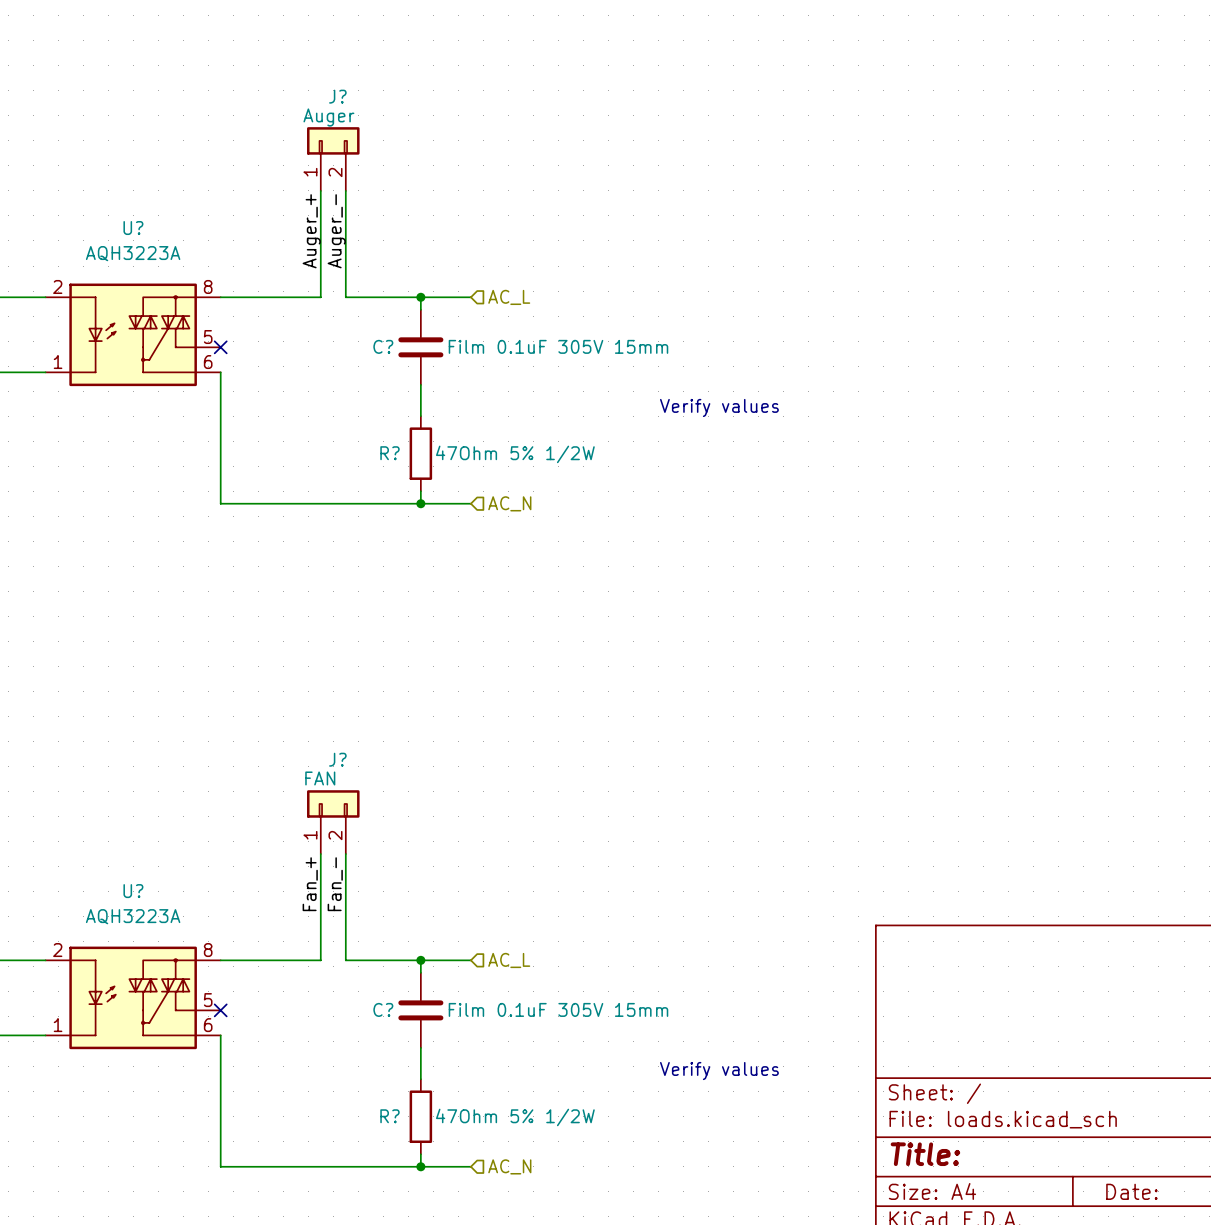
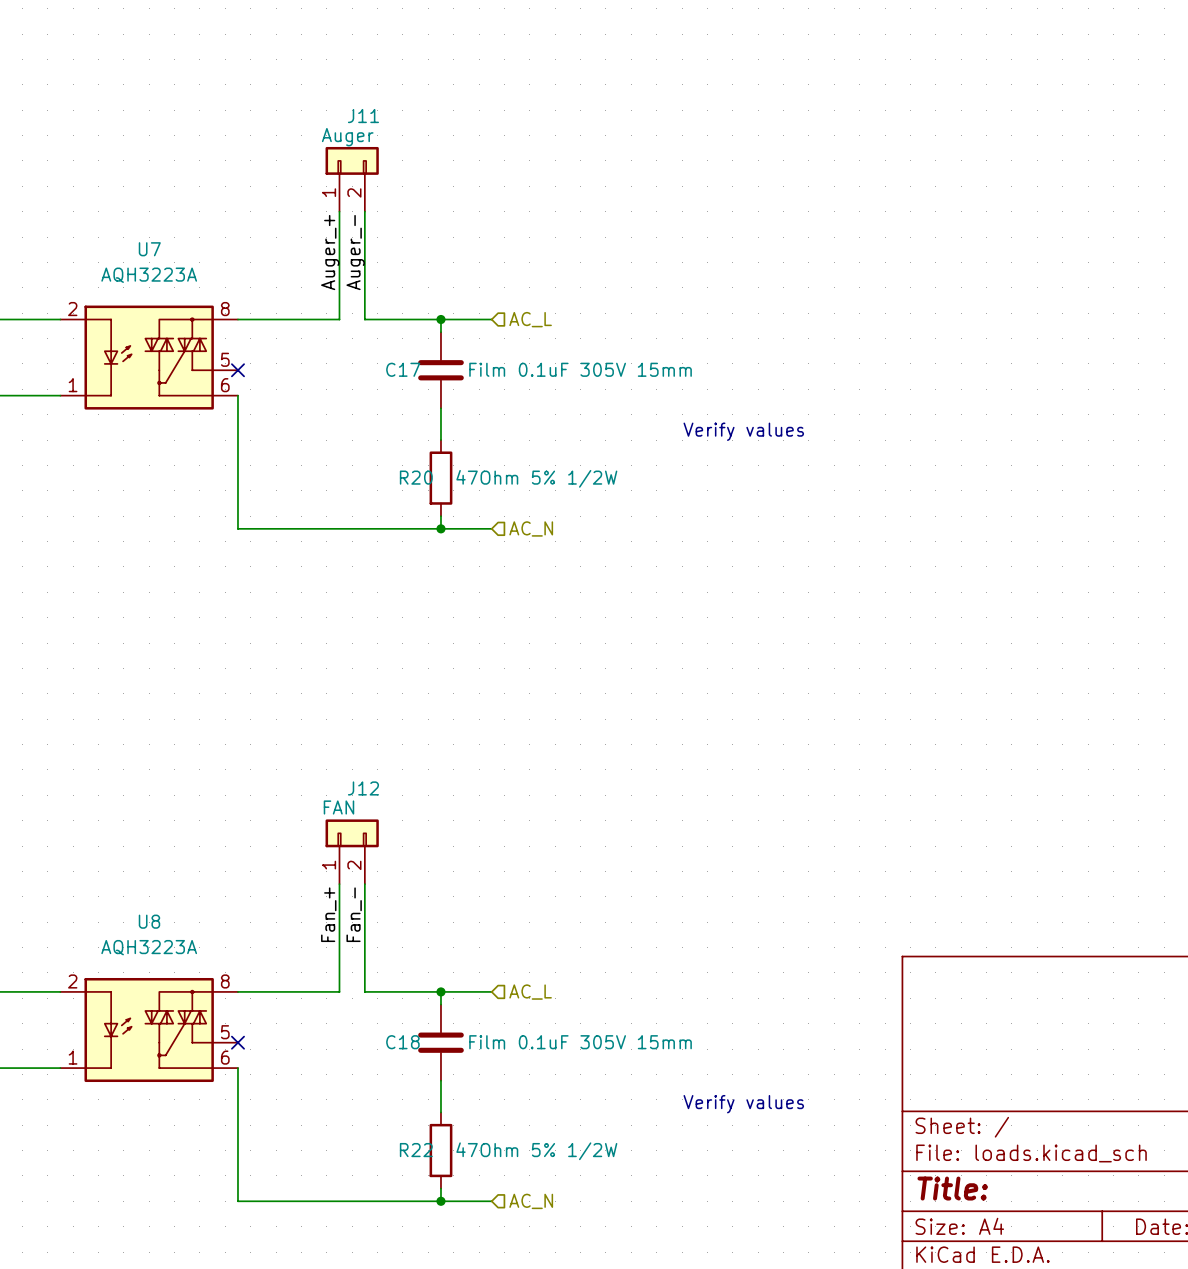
J? name: J? (337, 96) -> J11 (363, 116)
U? name: U? (133, 228) -> U7 (149, 249)
C? name: C? (383, 346) -> C17 (403, 369)
R? name: R? (389, 453) -> R20 (416, 477)
J? name: J? (337, 759) -> J12 (363, 788)
U? name: U? (133, 891) -> U8 (149, 921)
C? name: C? (383, 1009) -> C18 (402, 1042)
R? name: R? (389, 1116) -> R22 (416, 1150)

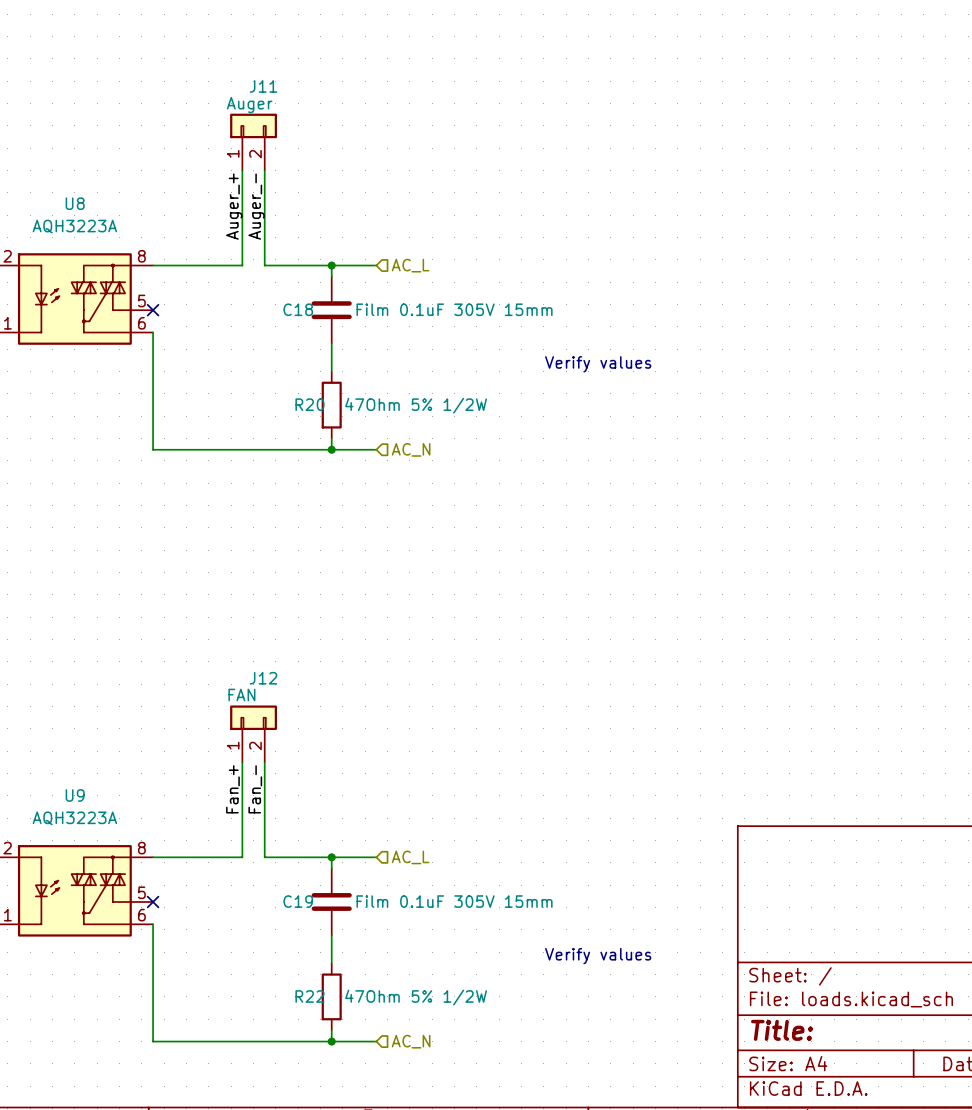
U7 name: U7 (149, 249) -> U8 (75, 203)
C17 name: C17 (403, 369) -> C18 (298, 309)
U8 name: U8 (149, 921) -> U9 (75, 795)
C18 name: C18 (402, 1042) -> C19 (298, 901)

